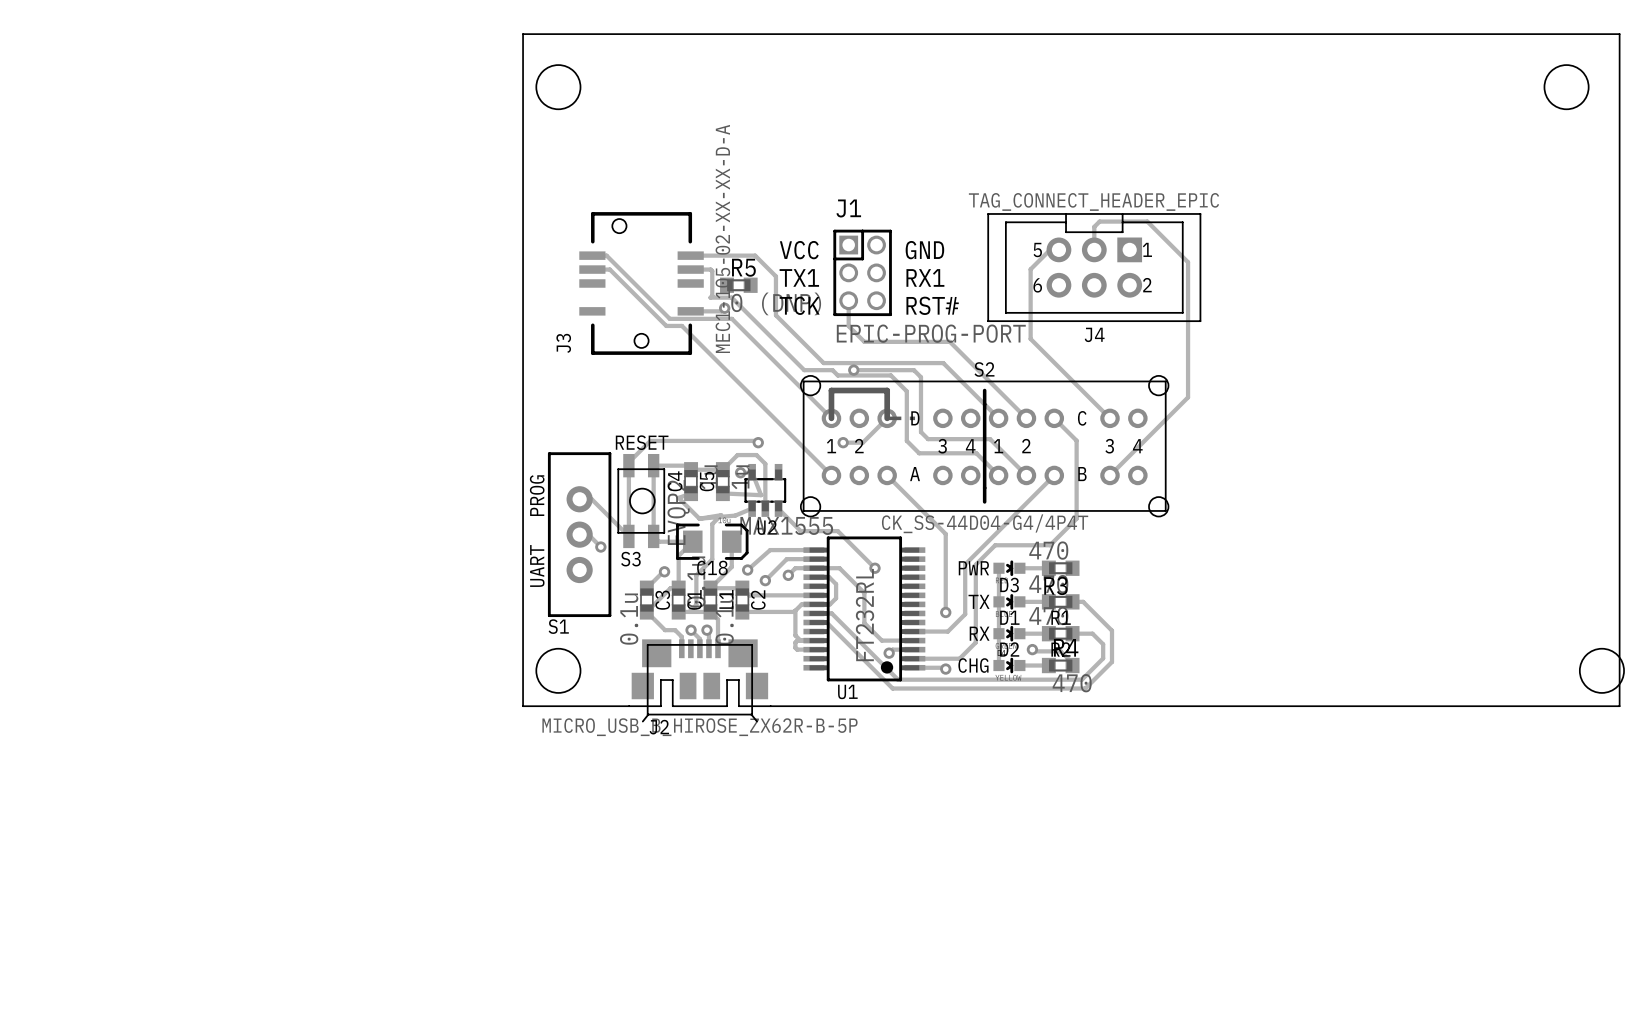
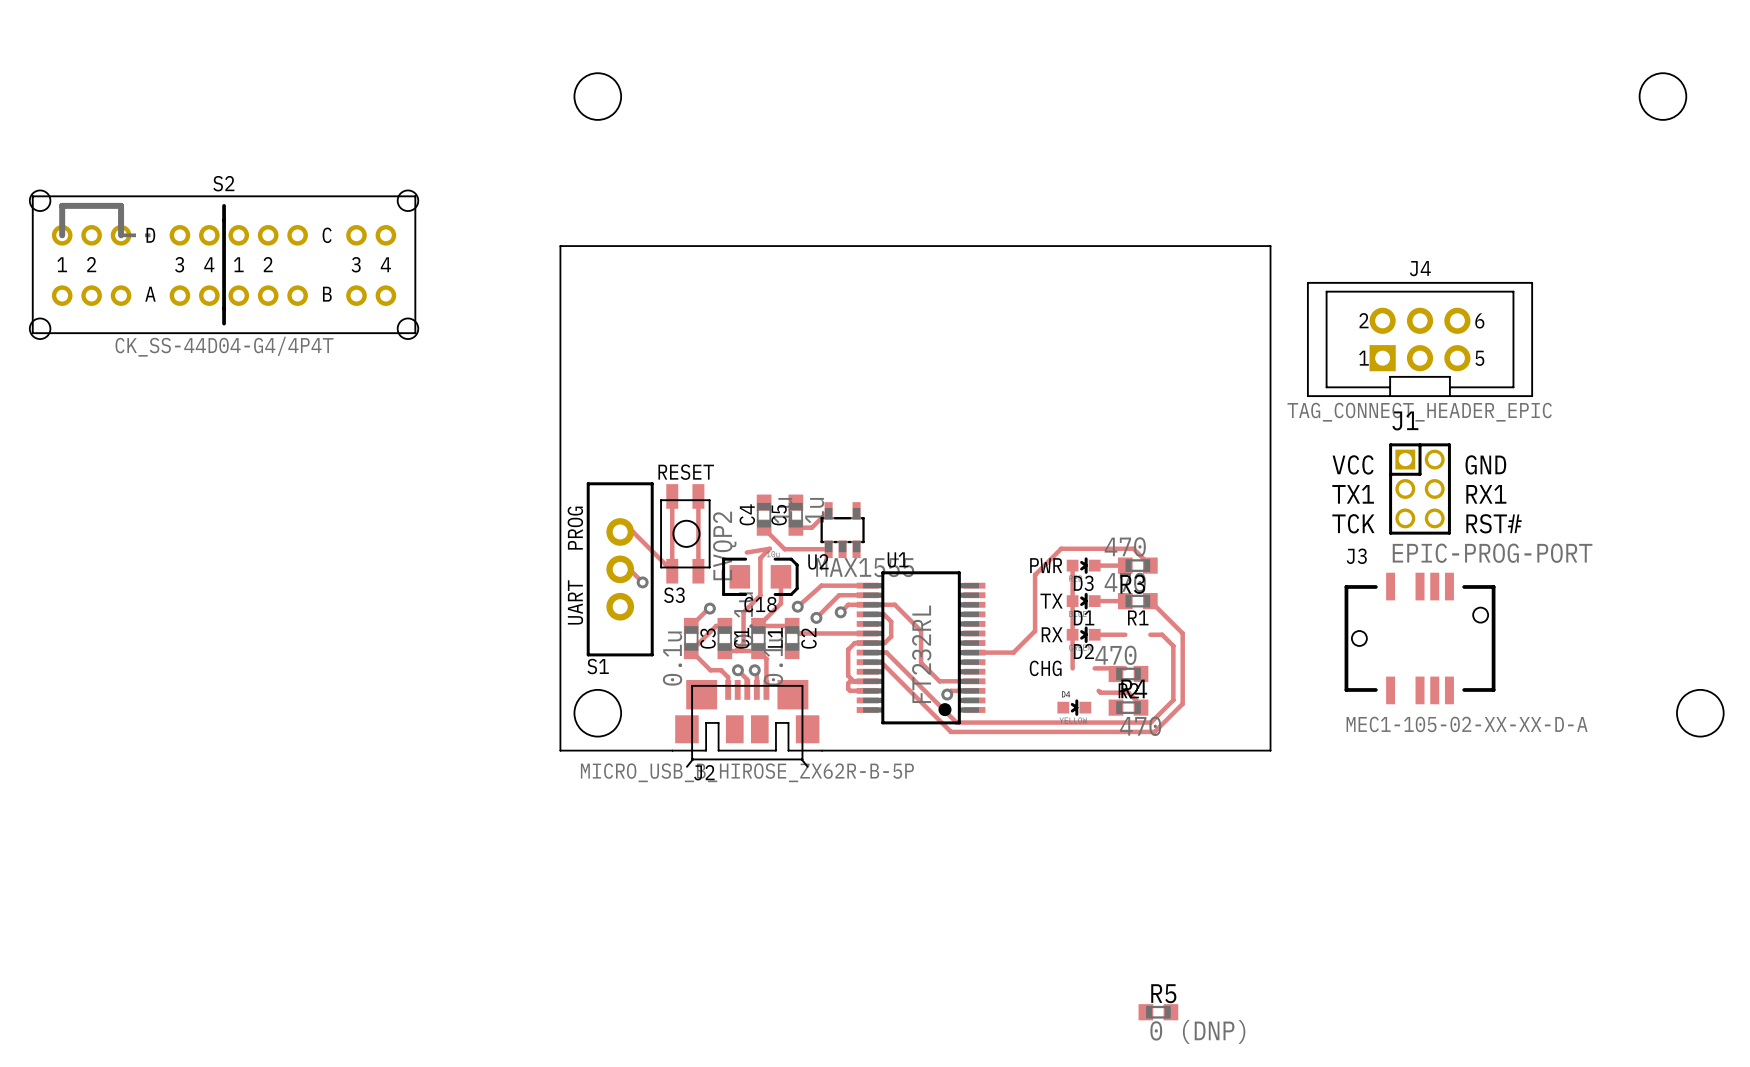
J4 value position: TAG_CONNECT_HEADER_EPIC (1093, 201) -> TAG_CONNECT_HEADER_EPIC (1419, 412)
J4 footprint: [987, 213, 1202, 323] -> [1306, 281, 1534, 398]
board edge: (523, 228) (523, 34) (1619, 34) (1619, 706) (1195, 706) -> (560, 246) (1270, 246) (1270, 750)
track: (1058, 249) (1050, 249) (1030, 269) (1030, 339) (1110, 418) -> none
track: (1094, 249) (1094, 226) (1099, 221) (1147, 221) (1188, 262) (1188, 397) (1110, 475) -> none
track: (592, 255) (606, 255) (669, 318) (731, 318) (831, 418) -> none
track: (690, 255) (755, 255) (775, 276) (775, 315) (823, 363) (943, 363) (998, 418) -> none
track: (592, 269) (609, 269) (666, 325) (681, 325) (831, 475) -> none
track: (690, 269) (710, 269) (712, 295) (710, 297) (731, 297) (804, 370) (832, 370) (837, 375) (890, 375) (906, 391) (906, 440) (919, 453) (976, 453) (998, 475) -> none
J1 position: (862, 272) -> (1420, 488)
J3 rotation: 0° (641, 283) -> 90° clockwise (1420, 638)
J3 position: (641, 283) -> (1420, 638)
R5 position: (738, 285) -> (1158, 1012)
track: (848, 300) (848, 326) (864, 341) (949, 341) (1026, 418) -> none
track: (724, 308) (721, 311) (690, 311) -> none
via: (724, 308) -> none
J4 name position: J4 (1094, 334) -> J4 (1420, 268)
track: (853, 370) (913, 370) (920, 377) (920, 432) (928, 439) (990, 439) (1026, 475) -> none
via: (853, 370) -> none
track: (887, 418) (862, 442) (843, 442) -> none
track: (1054, 418) (1076, 440) (1076, 518) (1050, 545) (995, 545) (975, 564) (975, 642) (959, 658) (914, 658) -> none
track: (758, 442) (756, 440) (650, 440) (628, 462) (628, 465) -> none
via: (758, 442) -> none
via: (843, 442) -> none
S2 position: (984, 446) -> (224, 264)
track: (653, 465) (686, 465) (691, 469) (722, 469) (737, 455) (756, 455) (765, 463) (765, 508) -> none
track: (740, 472) (752, 472) (761, 495) (722, 493) -> none
via: (740, 472) -> none
track: (887, 475) (945, 534) (945, 612) -> none
track: (1054, 475) (965, 564) (965, 614) (947, 631) (914, 631) -> none
track: none -> (828, 510) (811, 527) (795, 527)
C4 position: (691, 481) -> (764, 515)
C5 position: (722, 481) -> (795, 515)
U2 position: (765, 490) -> (842, 530)
track: (691, 493) (678, 497) (699, 518) (735, 515) (752, 508) -> none
track: none -> (764, 527) (784, 549) (828, 549)
track: (778, 508) (800, 531) (837, 531) (875, 568) -> none
track: none -> (1150, 565) (1133, 548) (1061, 548) (1035, 574) (1035, 631) (1013, 652) (974, 652)
track: (653, 536) (658, 541) (692, 541) (678, 555) (678, 588) -> none
via: (875, 568) -> none
text position: PWR (973, 568) -> PWR (1046, 565)
track: (998, 568) (998, 665) -> (1072, 565) (1072, 668)
D3 position: (1009, 568) -> (1083, 565)
track: (1019, 568) (1048, 568) -> (1094, 565) (1125, 565)
R3 position: (1060, 568) -> (1137, 565)
text position: TX (979, 601) -> TX (1051, 601)
D1 position: (1009, 601) -> (1083, 601)
track: (1019, 601) (1048, 601) -> (1094, 601) (1125, 601)
R1 position: (1060, 601) -> (1137, 601)
track: (1072, 601) (1083, 601) (1112, 630) -> (1150, 601) (1182, 633) (1182, 670)
track: (795, 610) (742, 611) -> none
via: (945, 612) -> none
text position: RX (979, 633) -> RX (1052, 634)
D2 position: (1009, 633) -> (1083, 634)
track: (1019, 633) (1048, 633) -> (1094, 634) (1125, 634)
track: (1072, 633) (1092, 633) (1103, 644) -> (1150, 634) (1162, 634) (1173, 645) (1173, 685)
via: (1032, 649) -> none
text position: CHG (973, 665) -> CHG (1045, 668)
track: (1019, 665) (1048, 665) -> (1094, 668) (1125, 668)
track: (914, 667) (945, 669) -> none
via: (945, 669) -> none
U1 name position: U1 (847, 691) -> U1 (898, 559)

